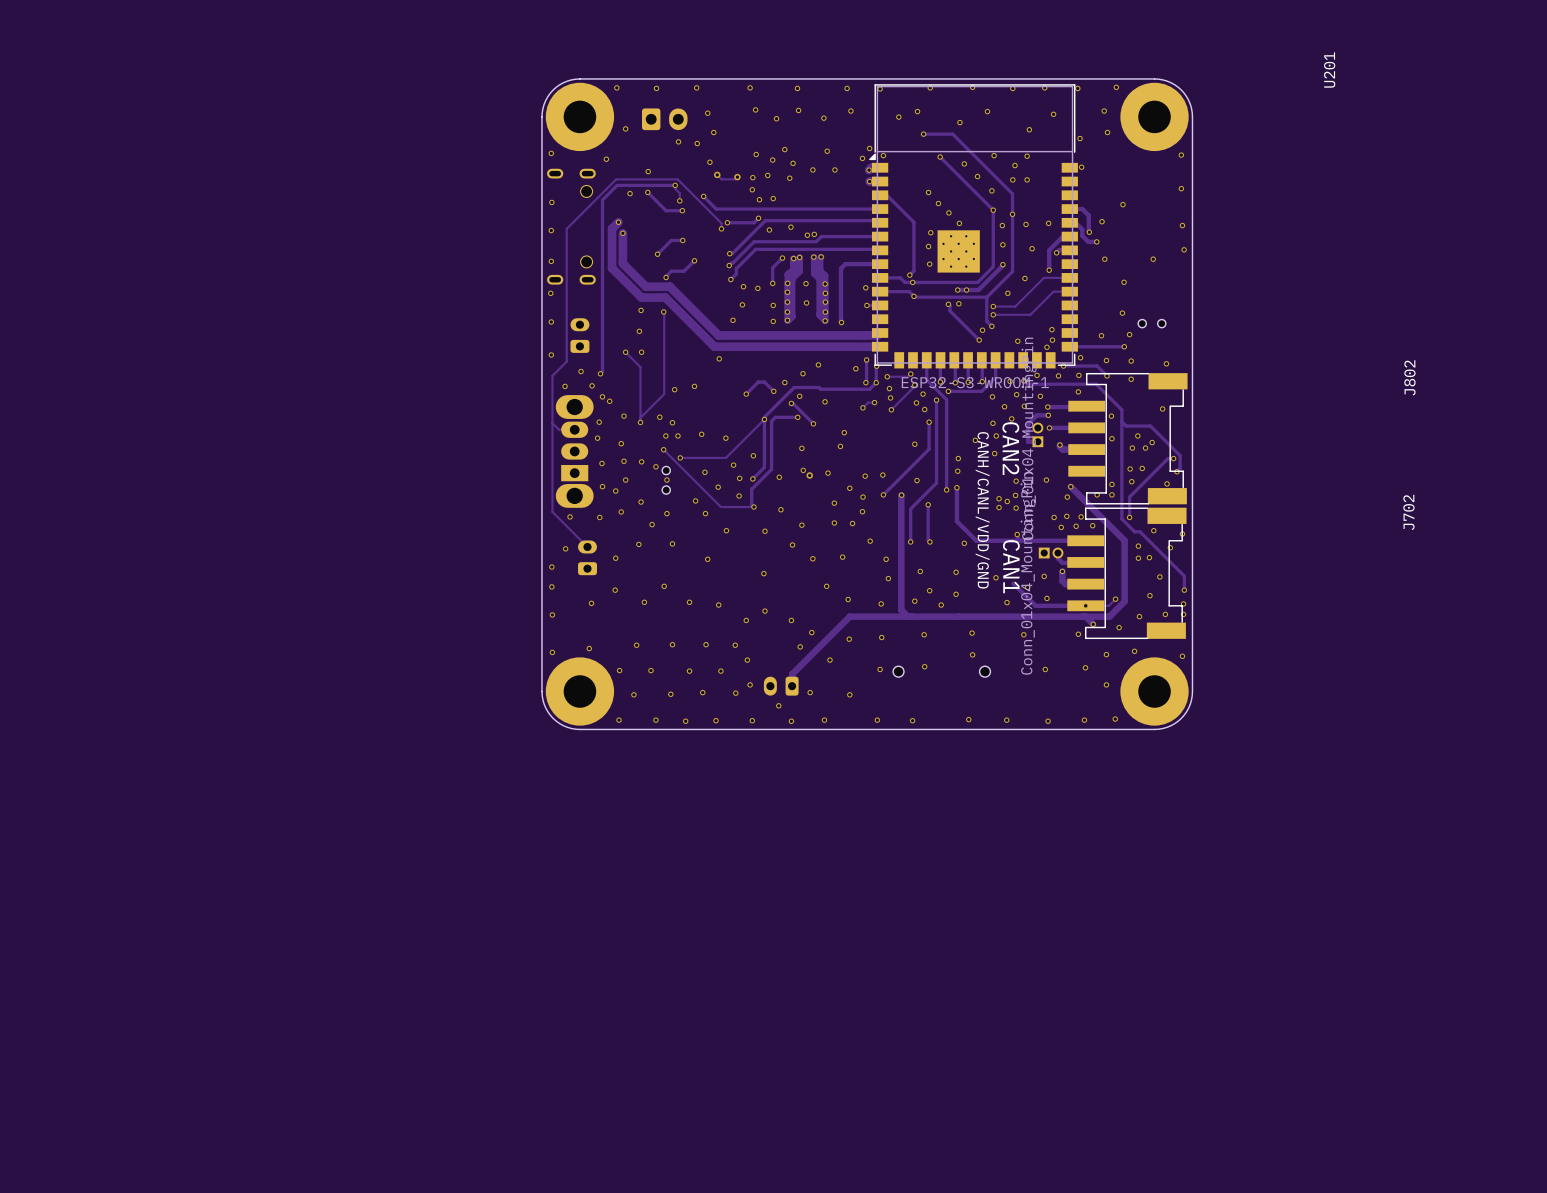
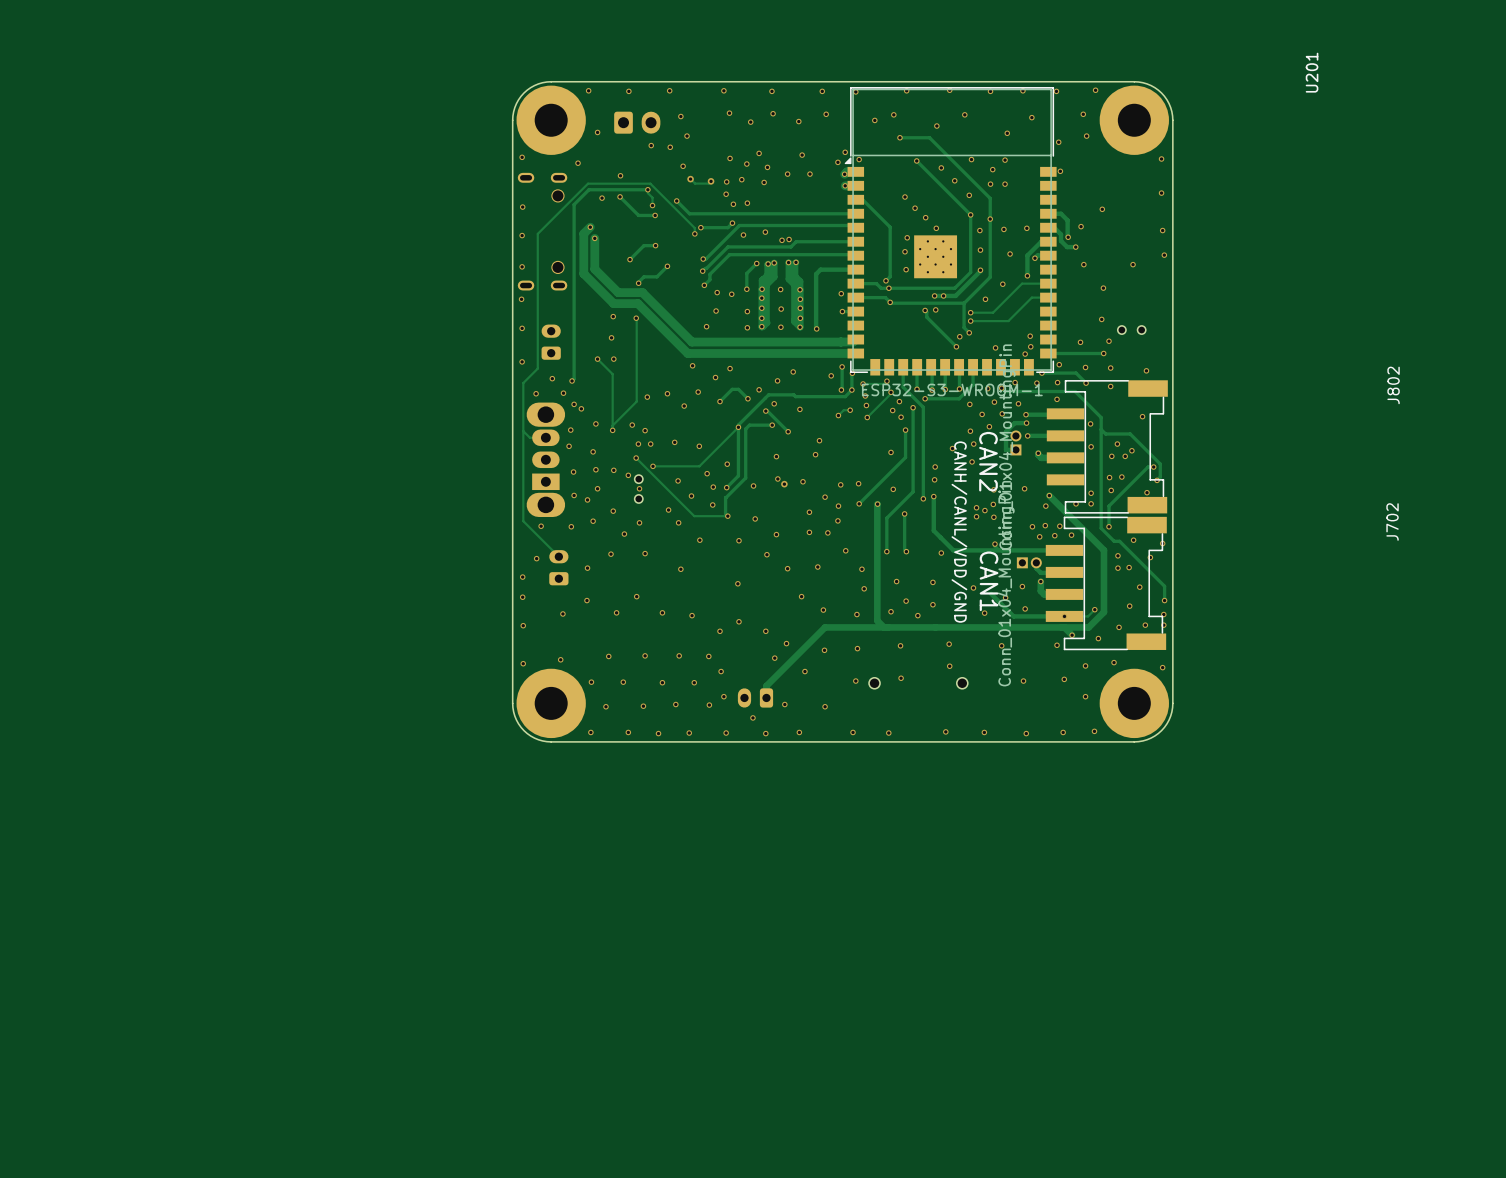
via: none -> (780, 327)
via: none -> (730, 368)
via: none -> (715, 377)
via: none -> (698, 392)
via: none -> (684, 406)

